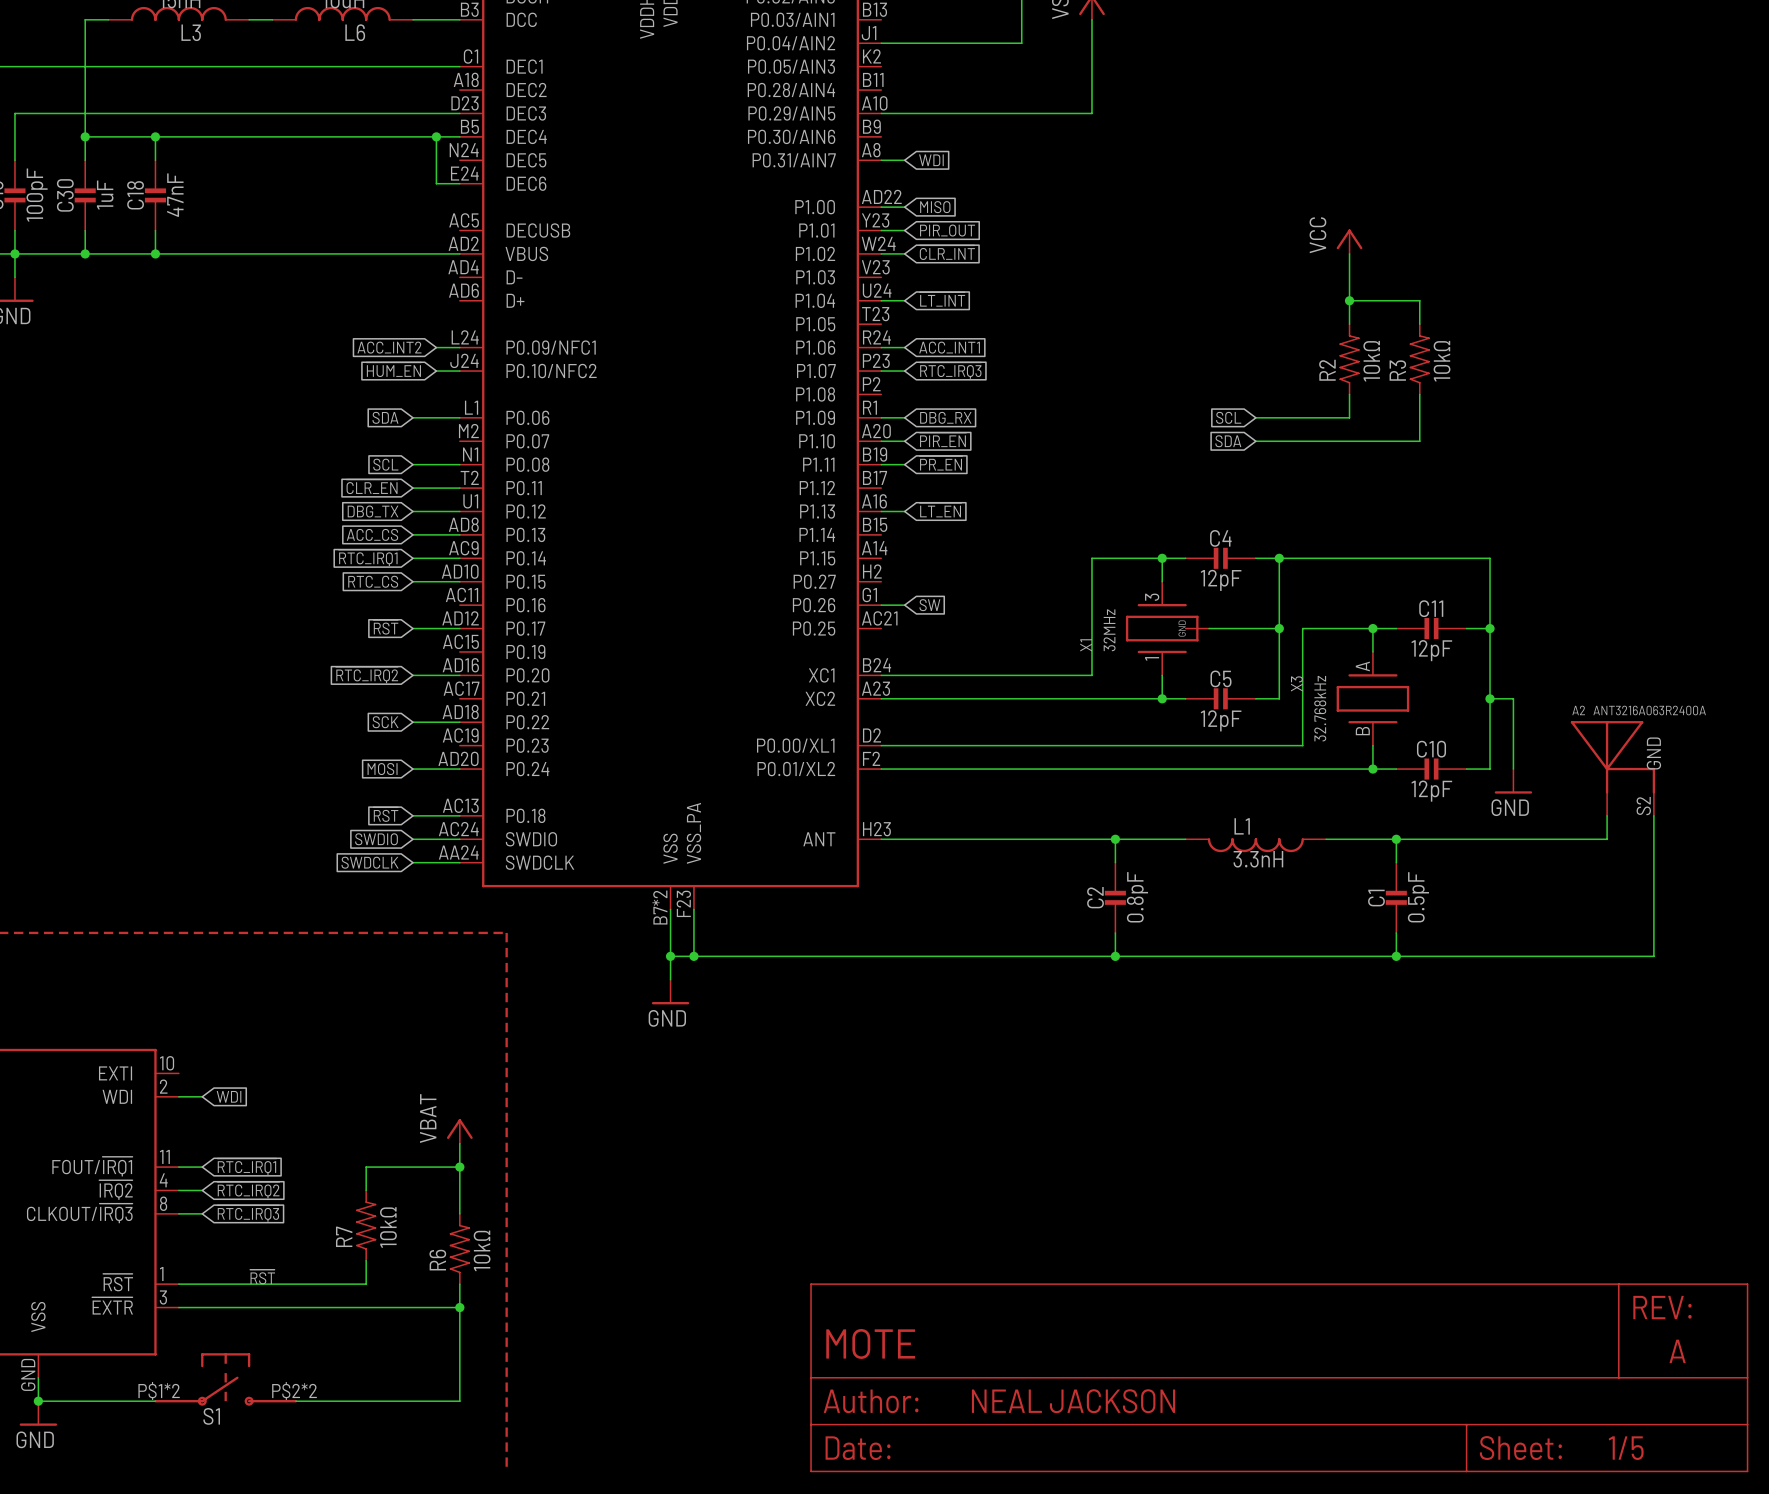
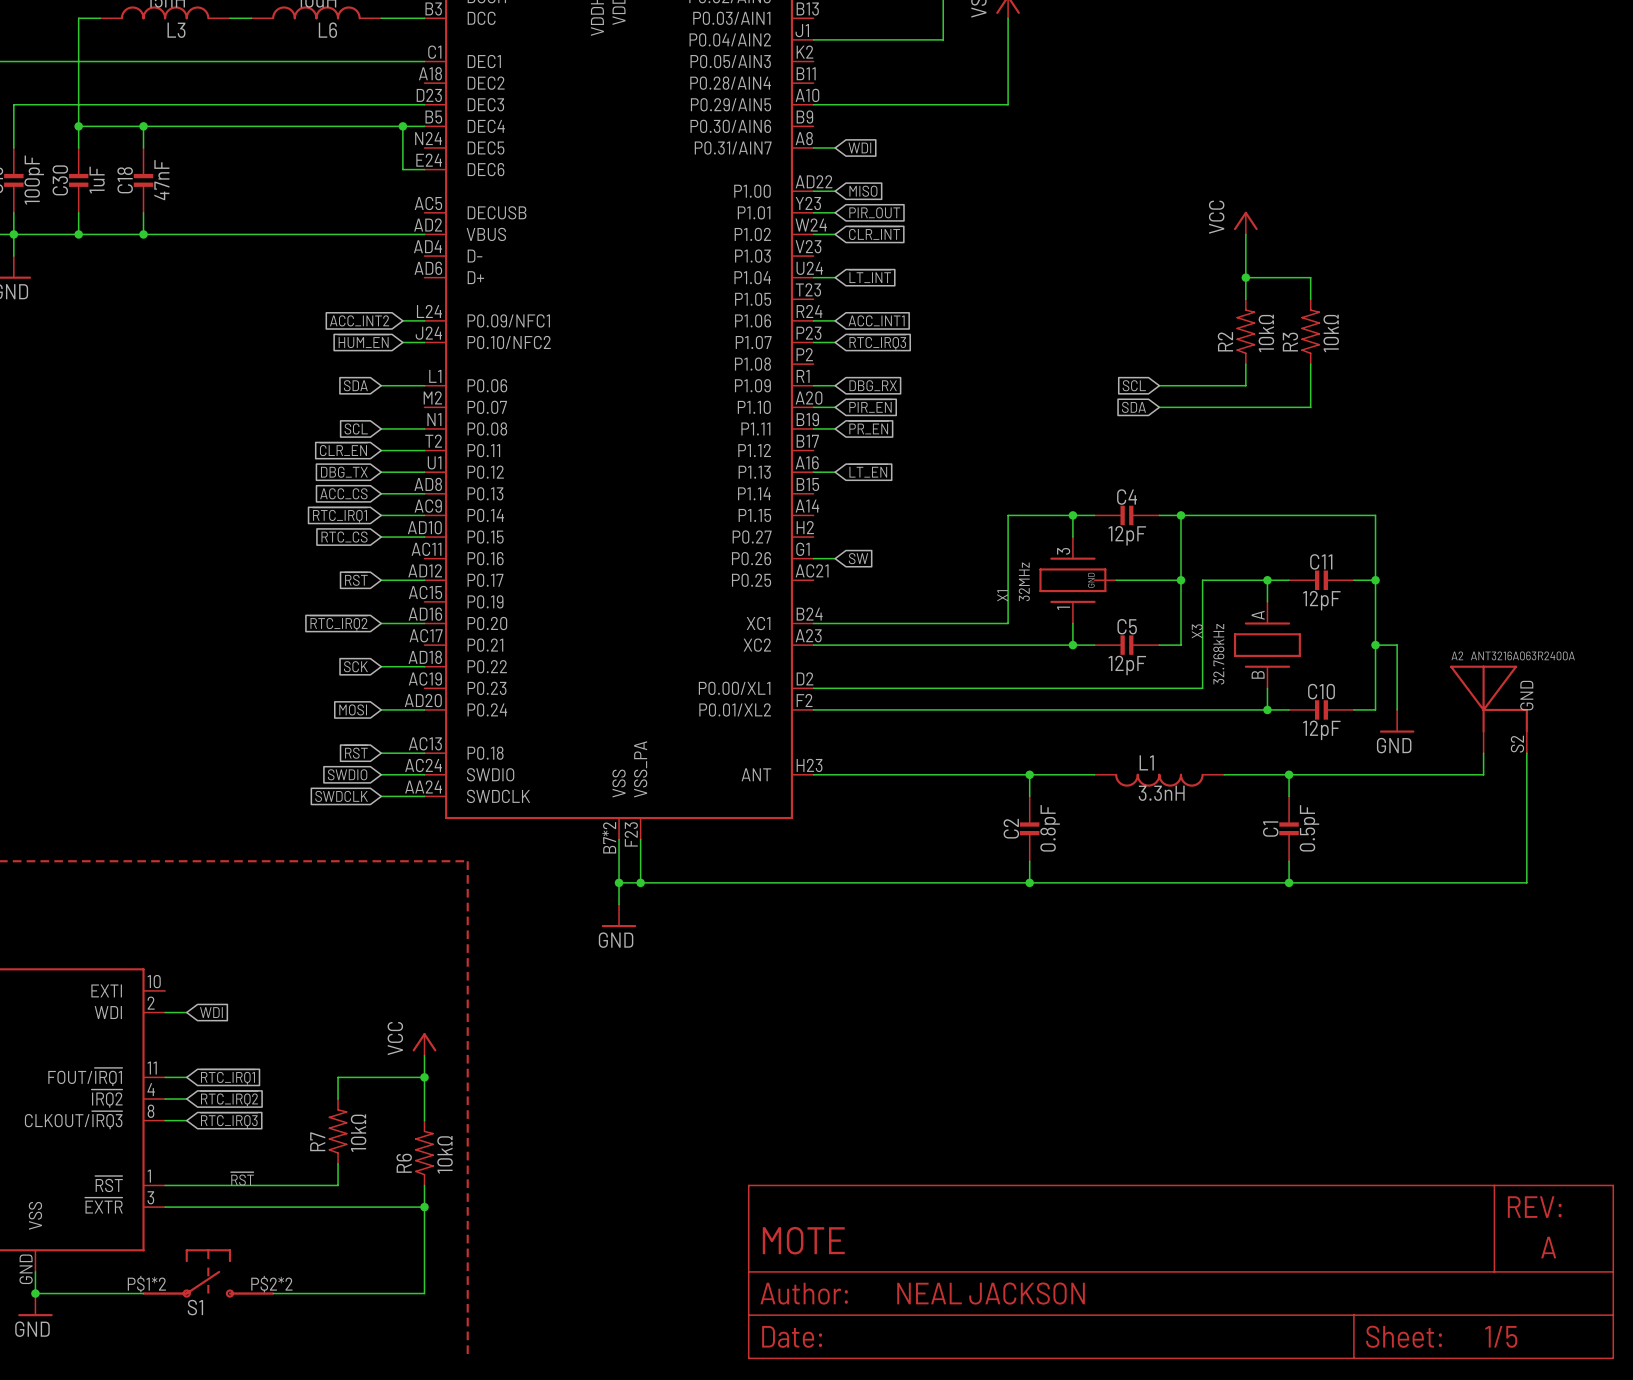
power symbol: VBAT (459, 1131) -> VCC (424, 1044)

